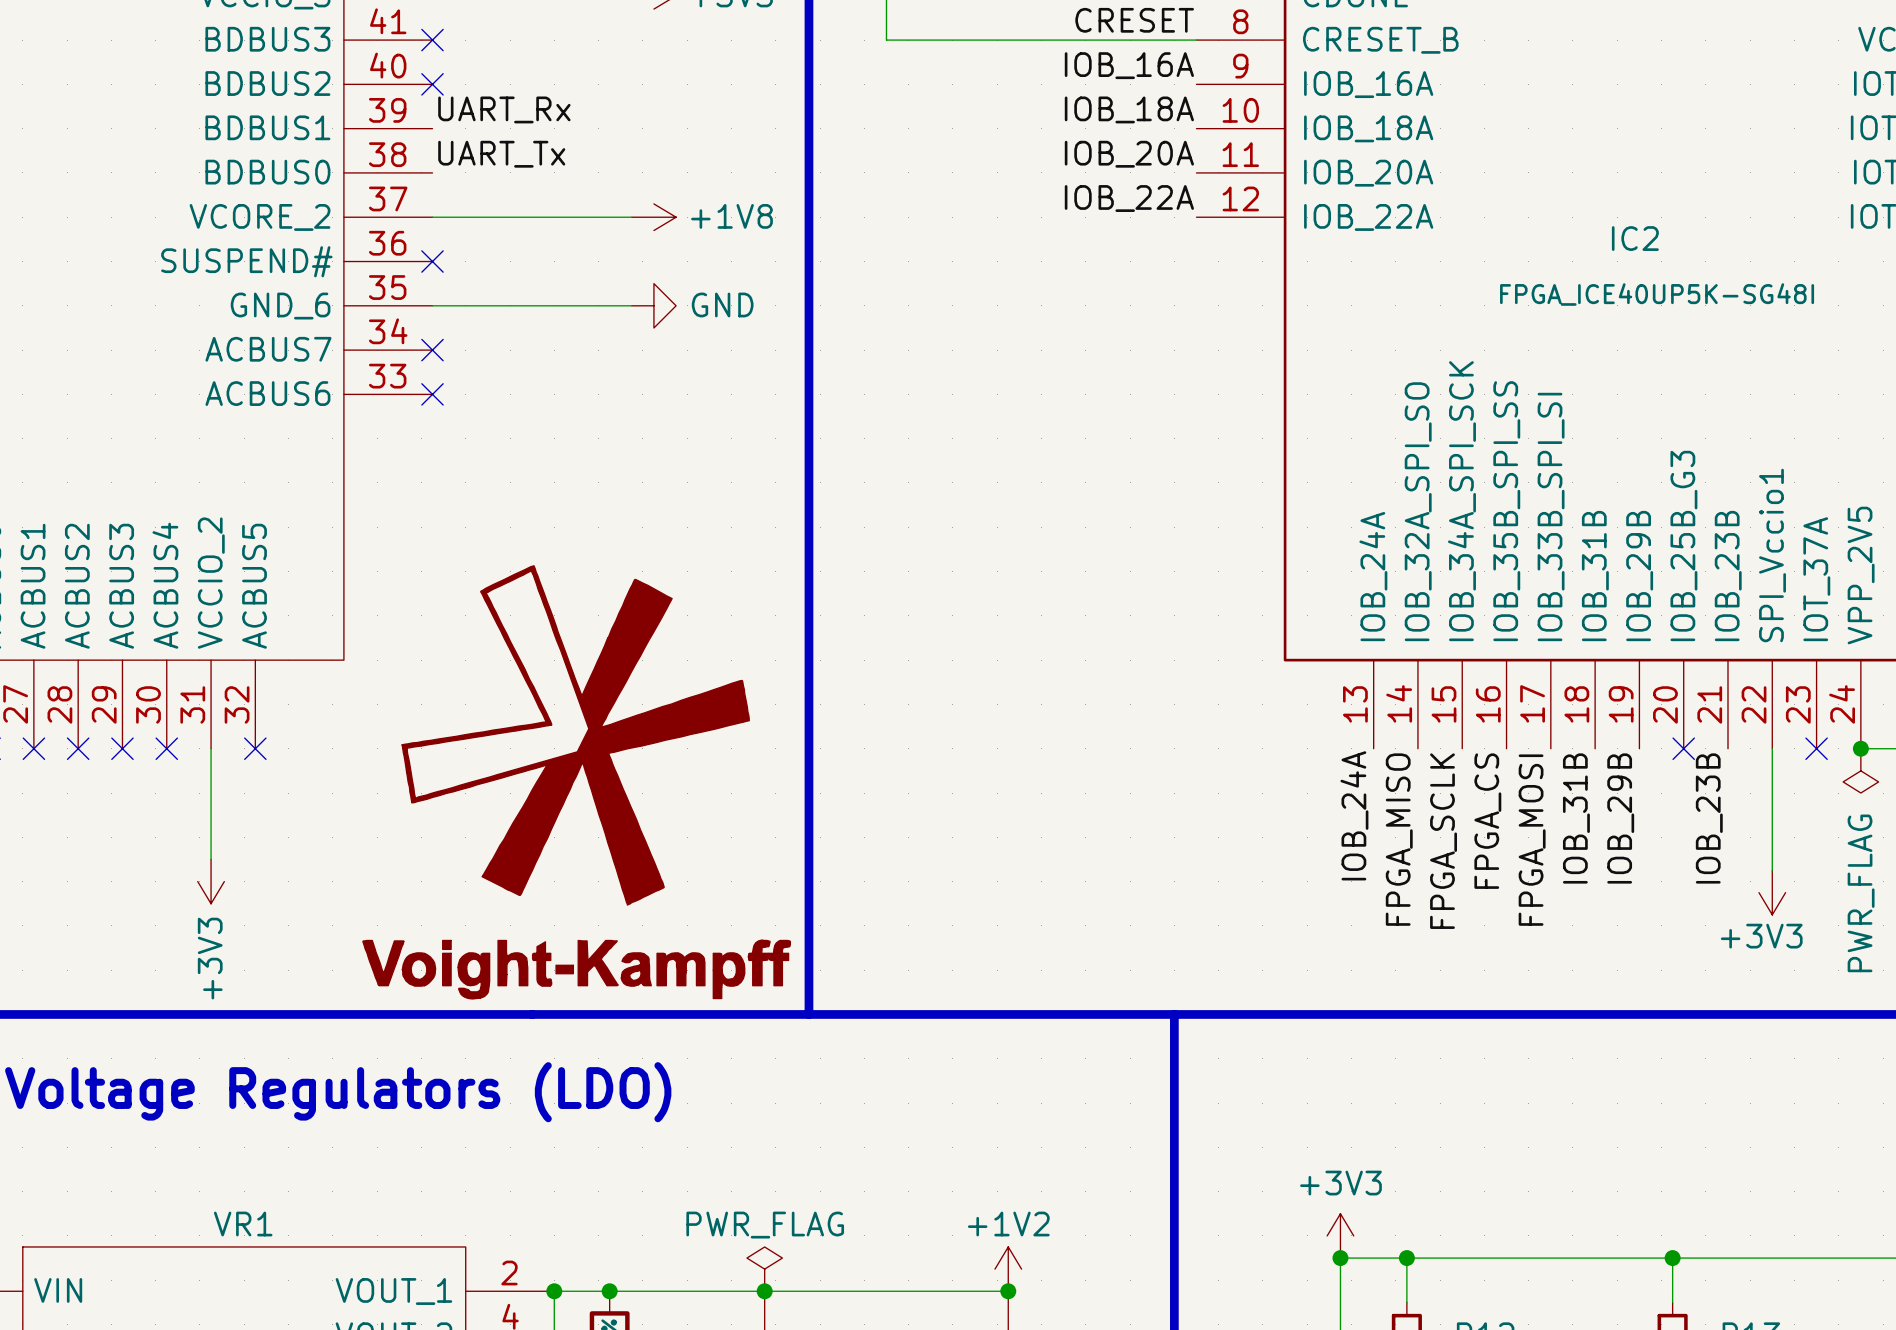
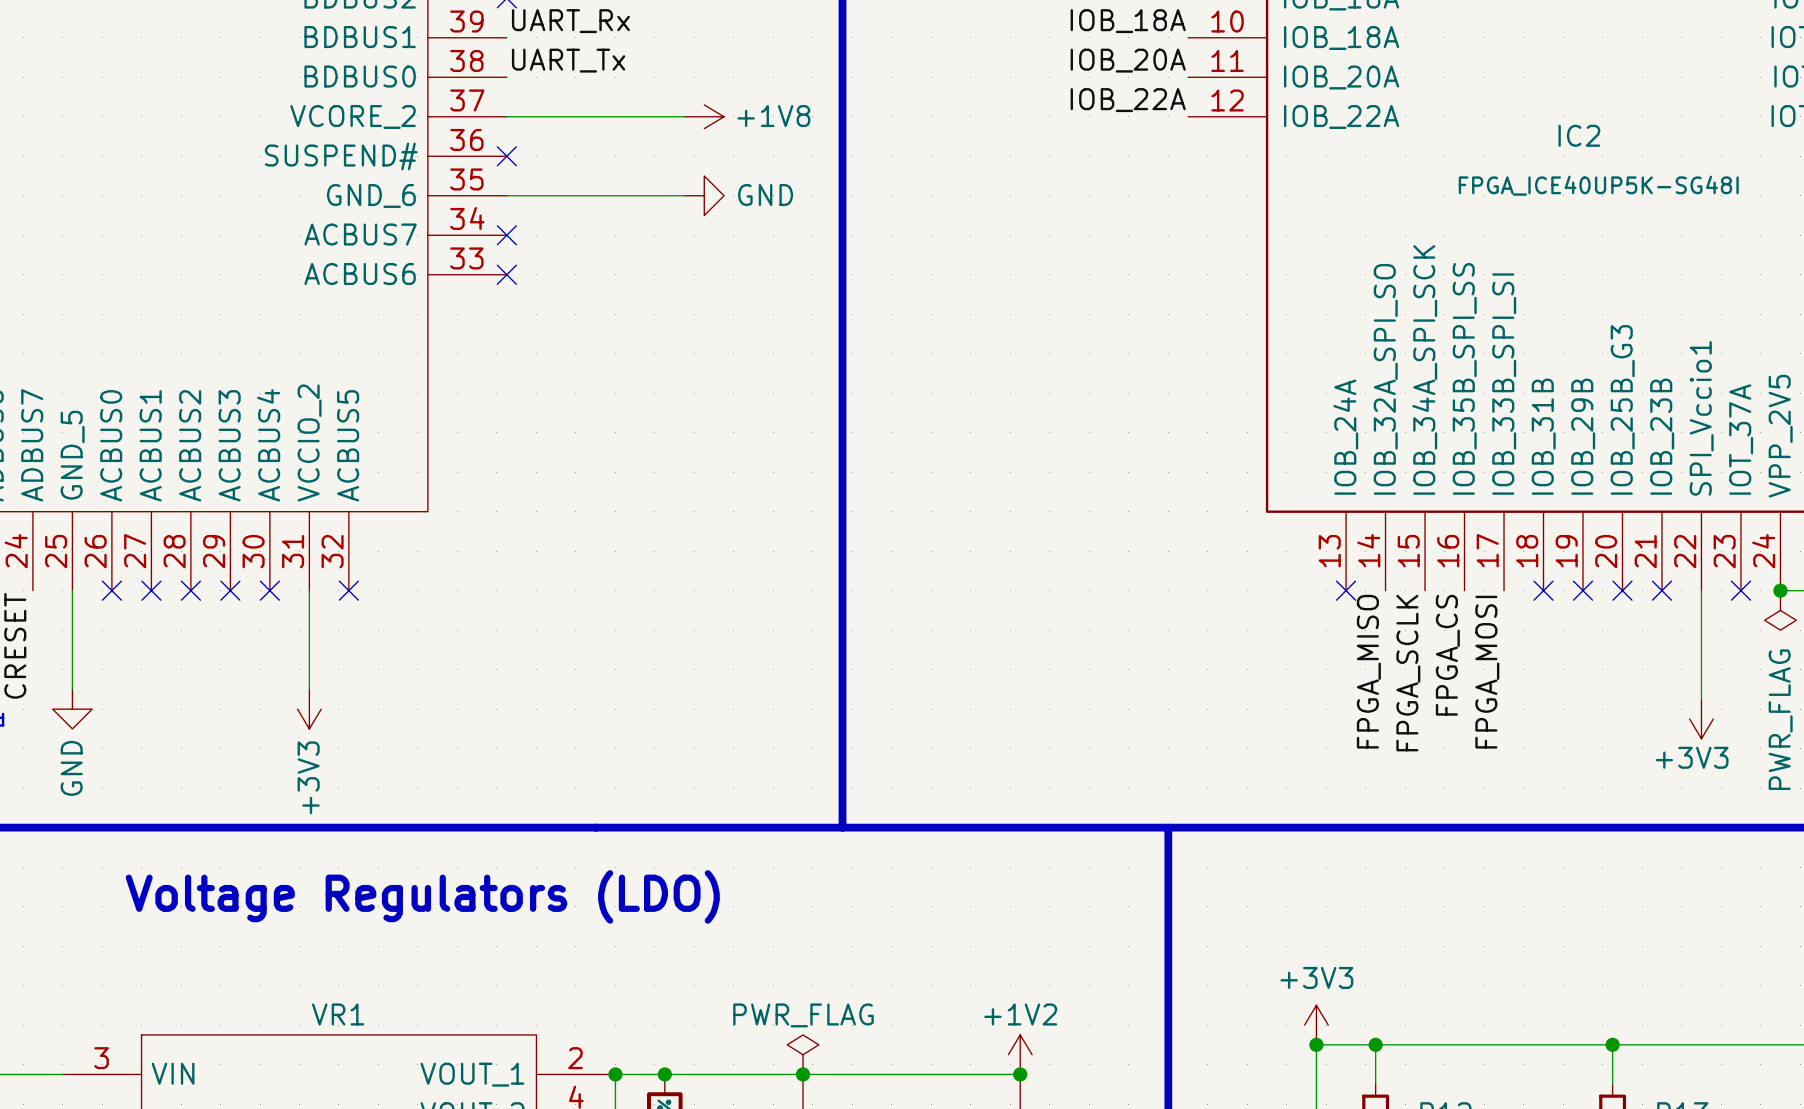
no-connect mark: none -> (1346, 590)
no-connect mark: none -> (1543, 590)
no-connect mark: none -> (1582, 590)
no-connect mark: none -> (1661, 590)
part: (576, 782) -> none
label: IOB_24A (1354, 815) -> none
label: IOB_31B (1576, 818) -> none
label: IOB_29B (1620, 818) -> none
label: IOB_23B (1709, 818) -> none

